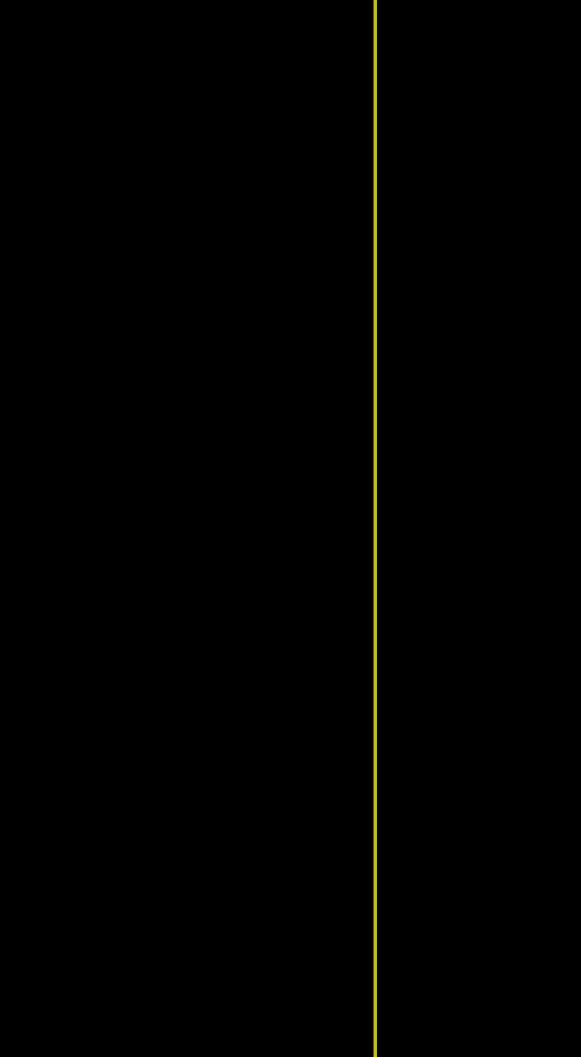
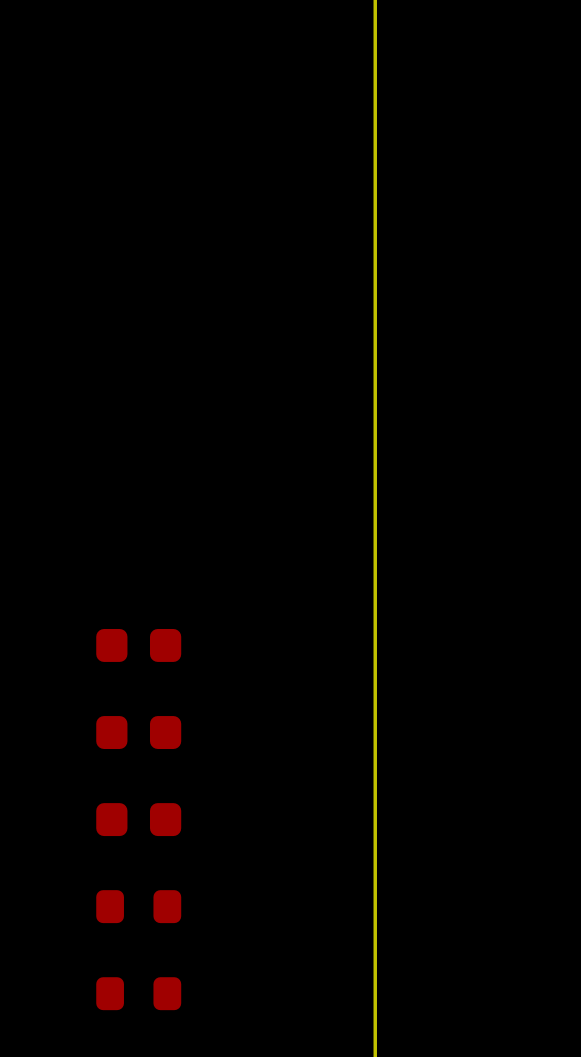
part: none -> (138, 645)
part: none -> (138, 732)
part: none -> (138, 819)
part: none -> (138, 906)
part: none -> (138, 993)

